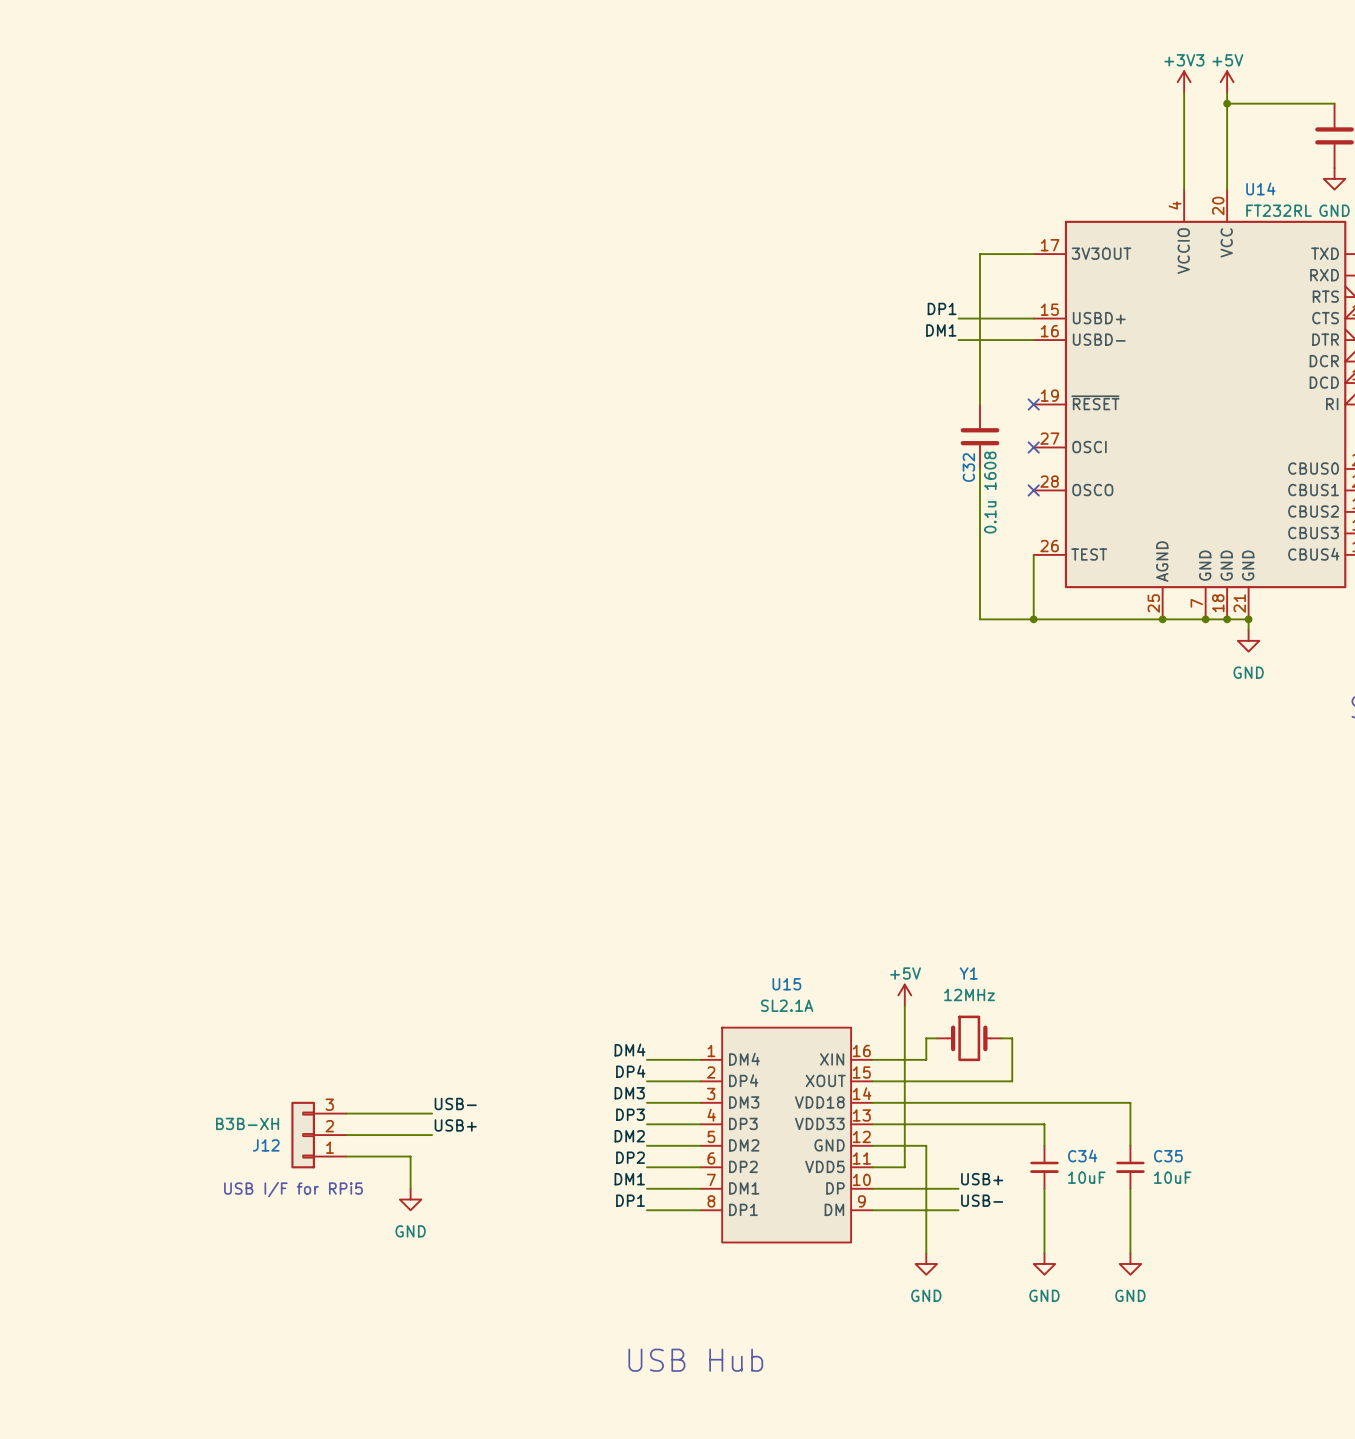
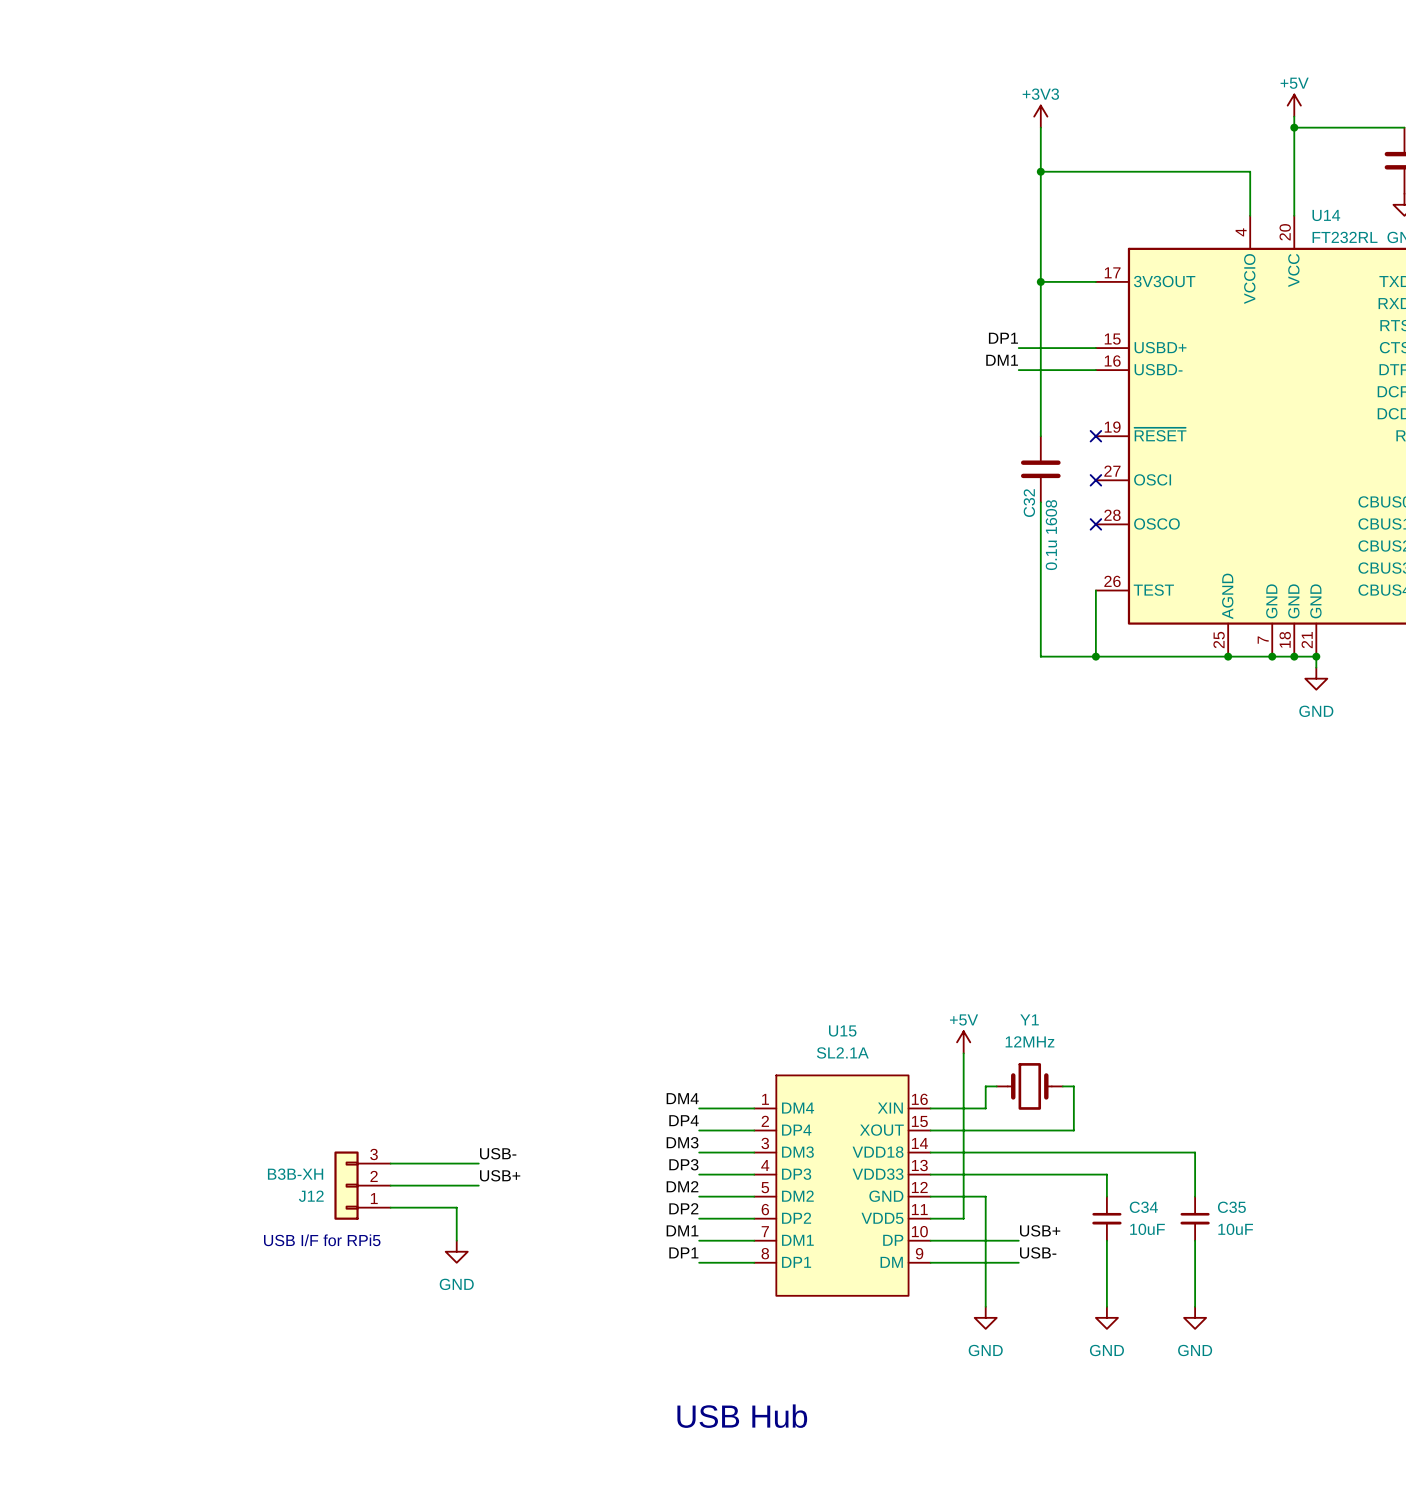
power symbol position: +3V3 (1184, 82) -> +3V3 (1040, 116)
wire: (1184, 92) (1184, 146) -> (1040, 171) (1250, 171)
wire: none -> (1040, 127) (1040, 281)
junction: none -> (1040, 171)
junction: none -> (1040, 281)

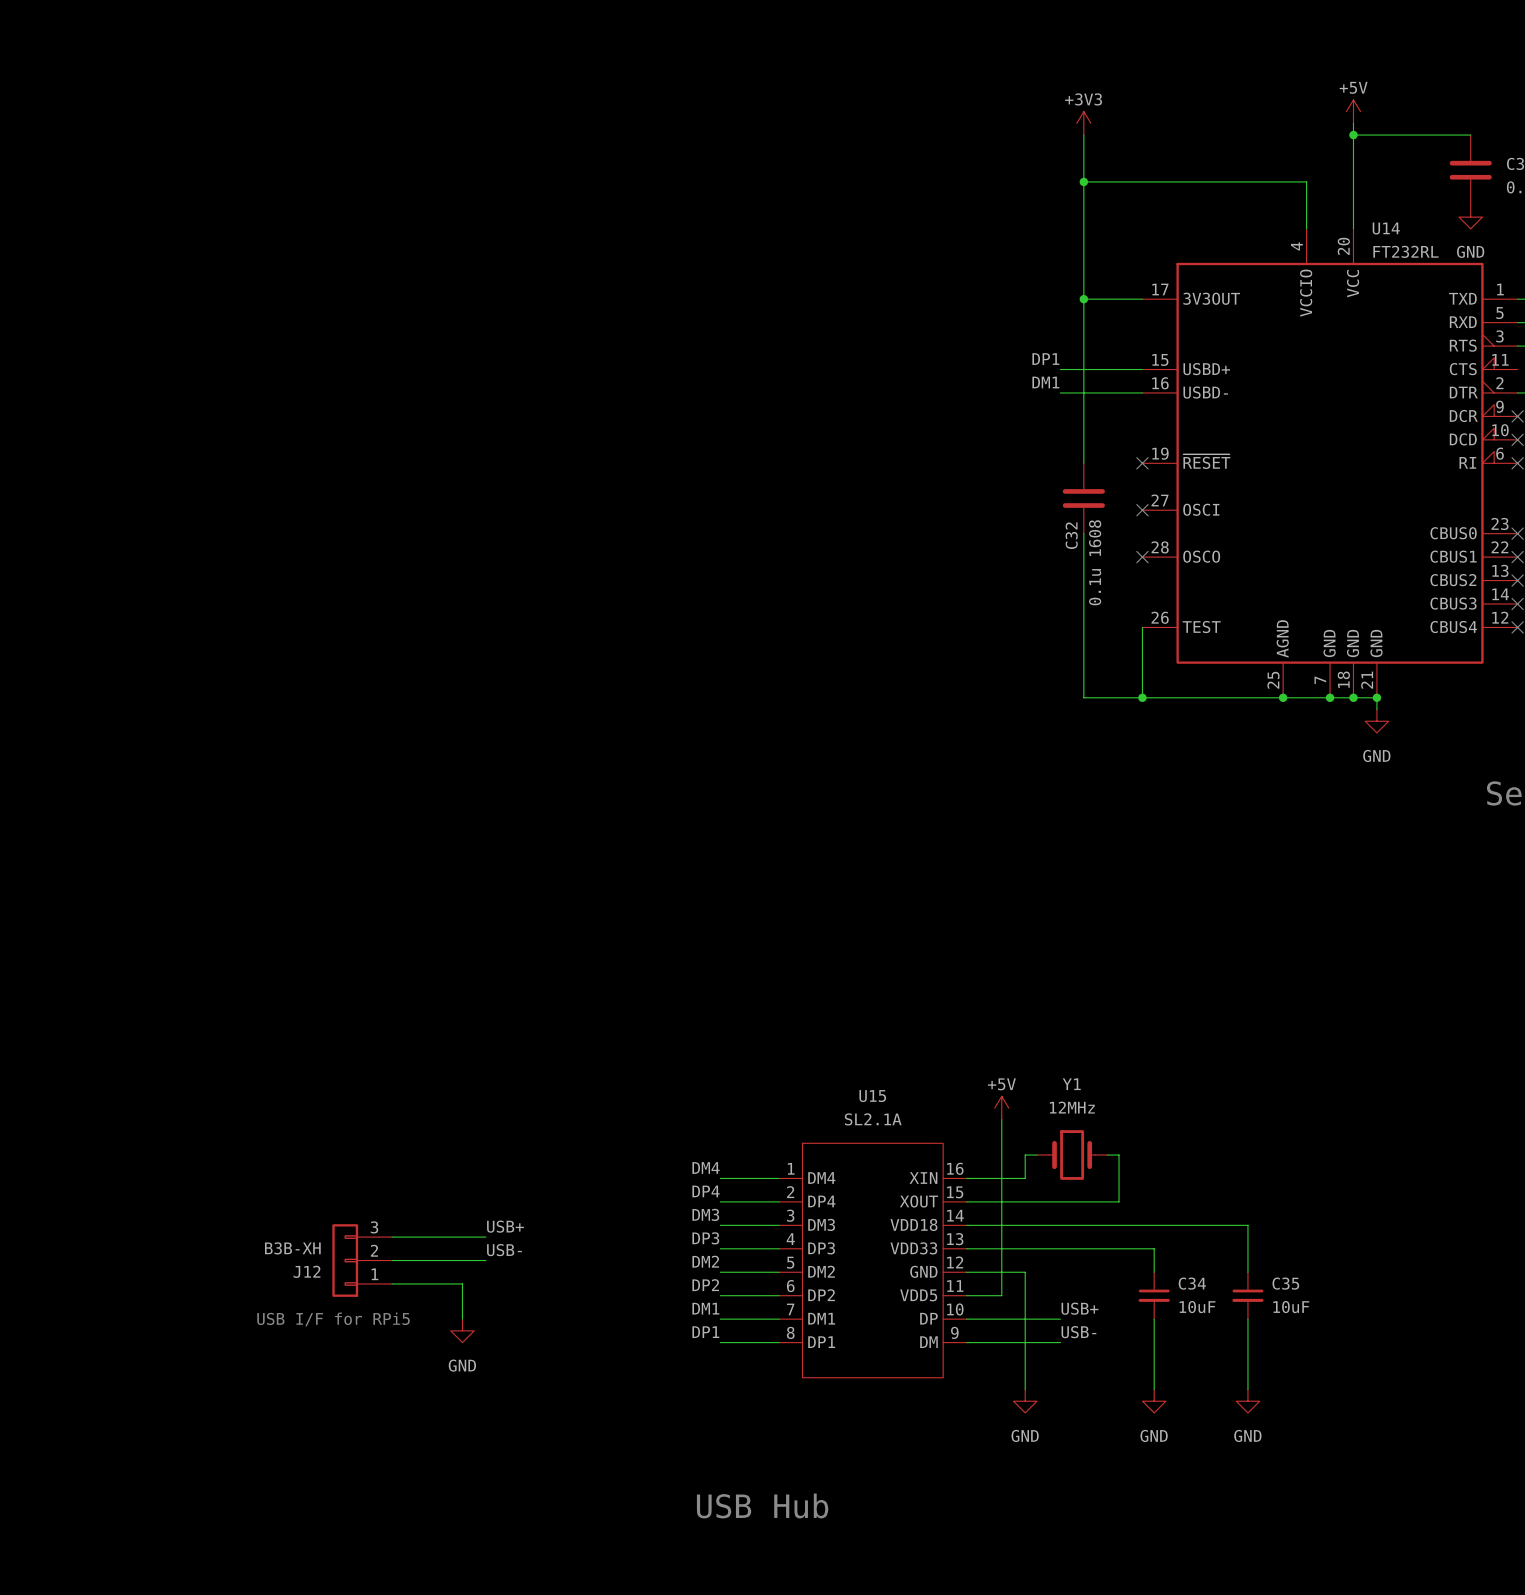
label: USB- (498, 1153) -> USB+ (505, 1226)
label: USB+ (500, 1175) -> USB- (504, 1250)

